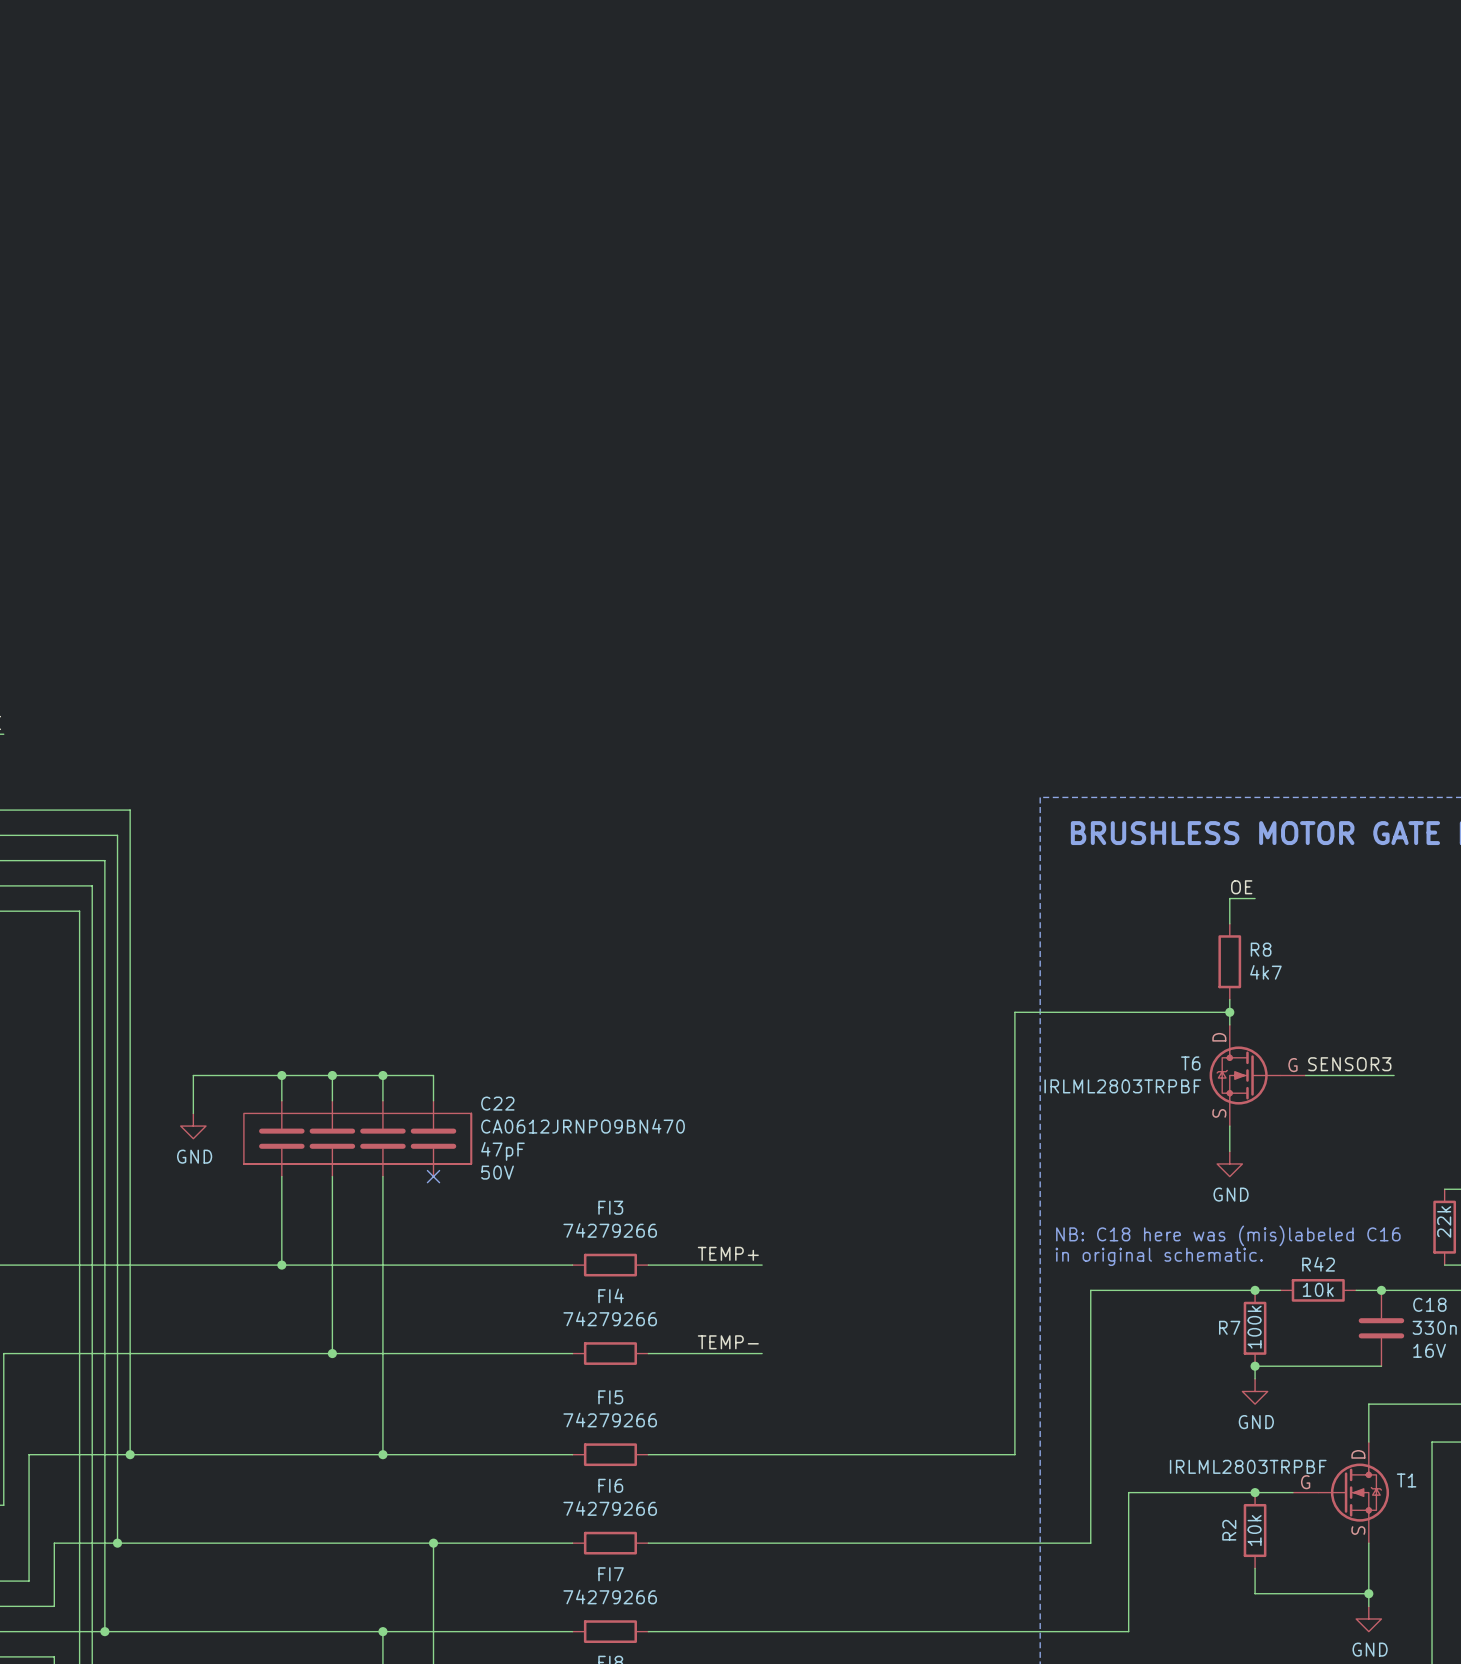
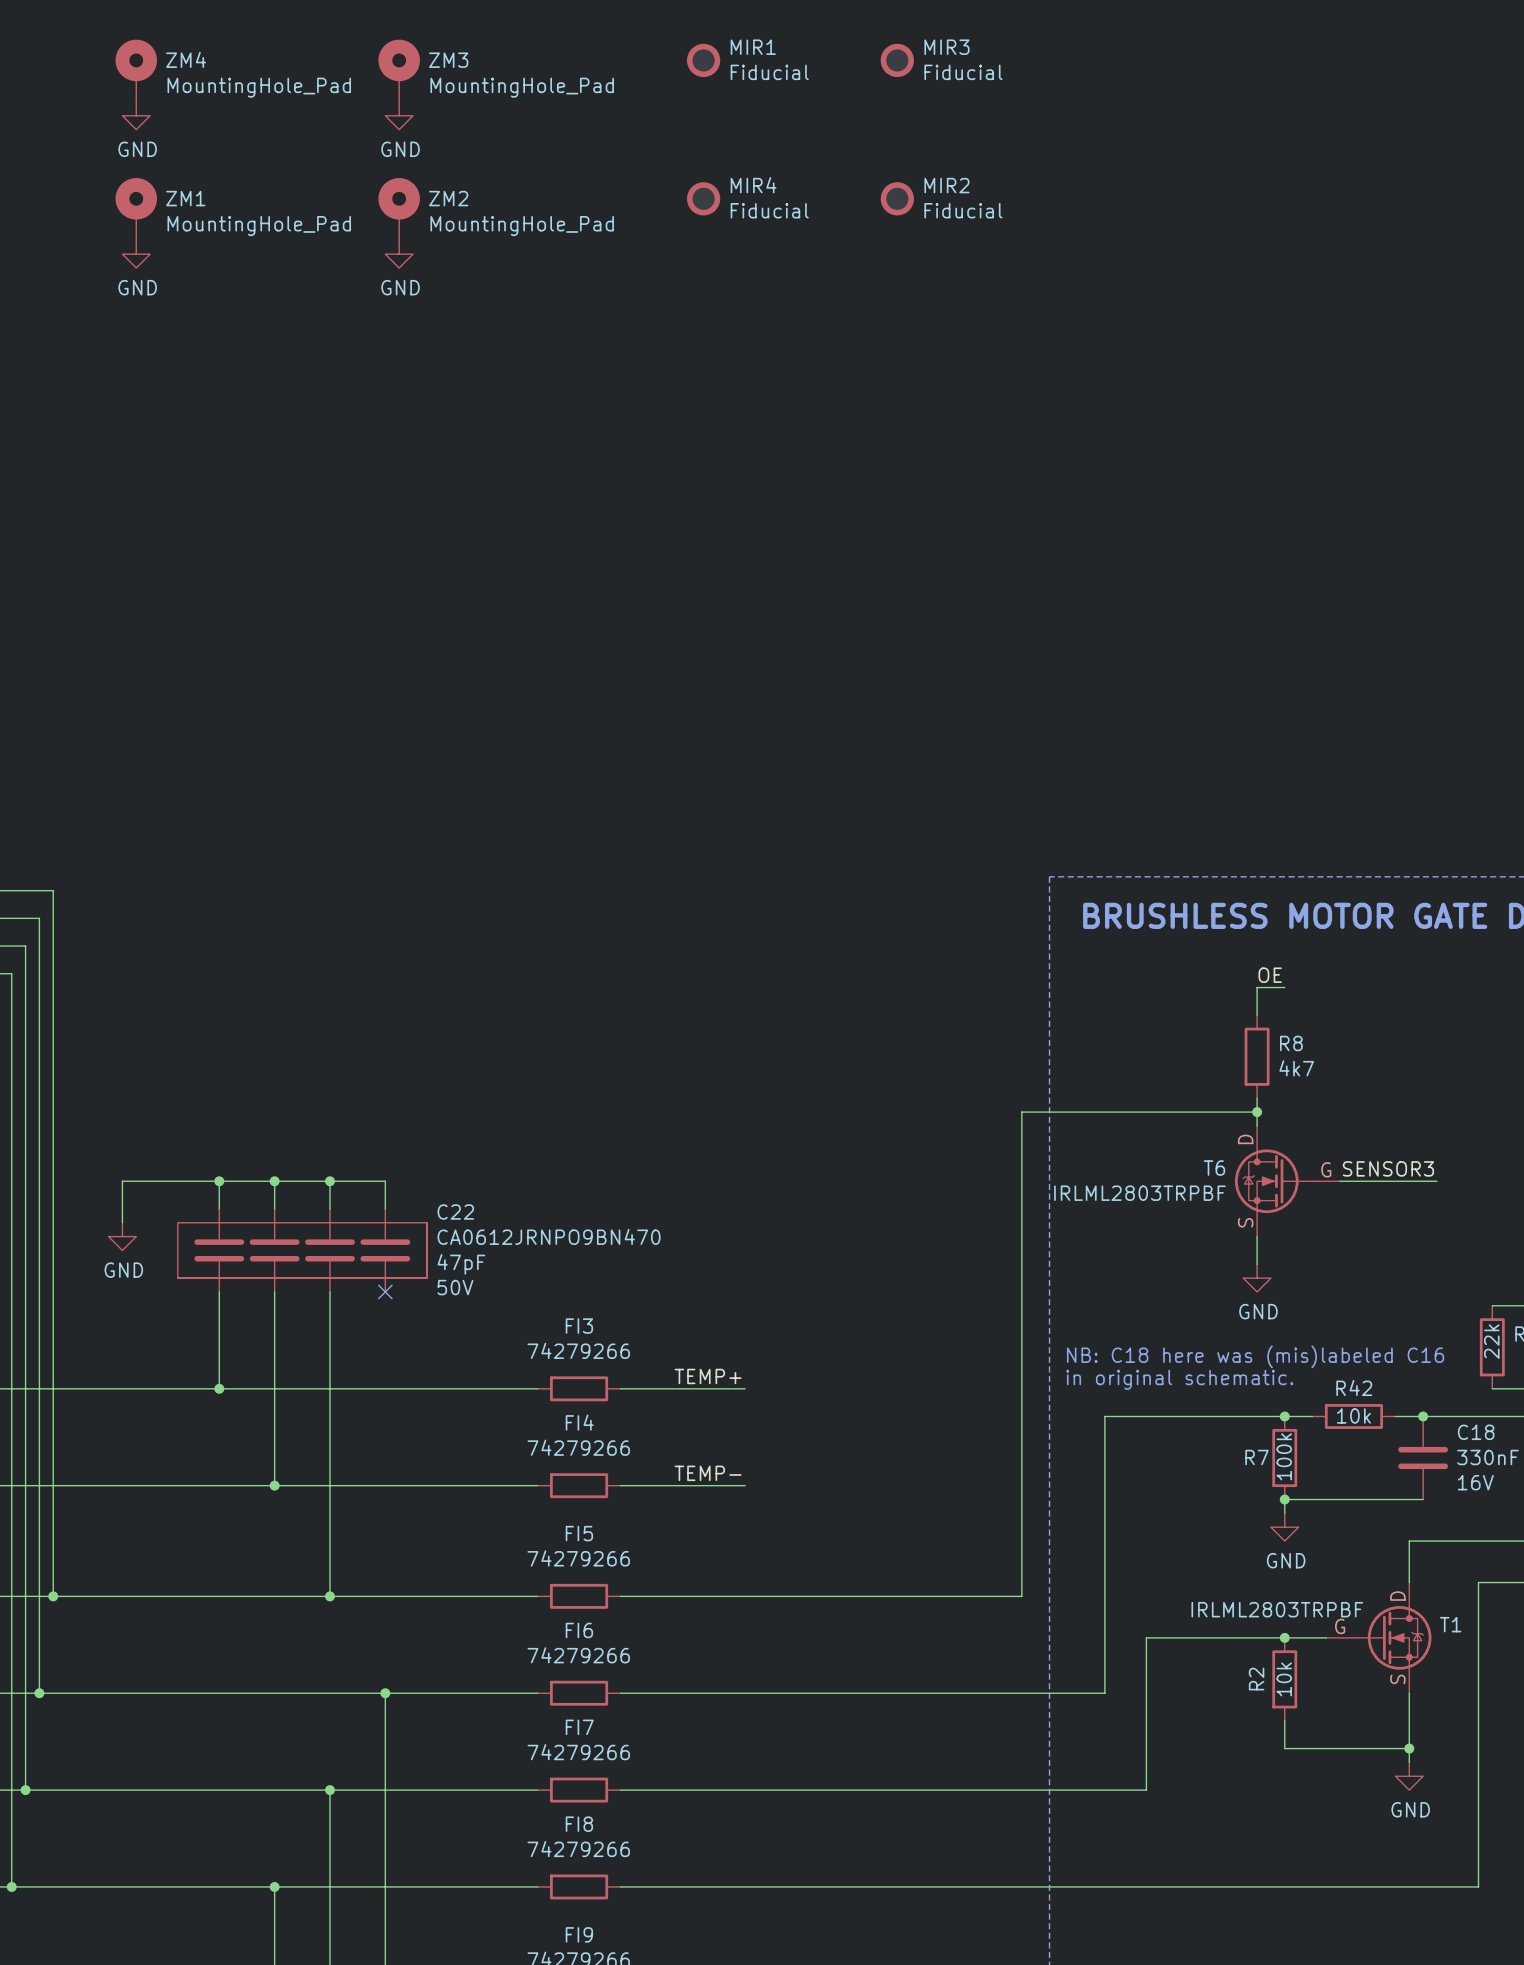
MIR1: none -> Fiducial (703, 60)
MIR3: none -> Fiducial (897, 60)
ZM4: none -> MountingHole_Pad (136, 70)
ZM3: none -> MountingHole_Pad (399, 70)
power symbol: none -> GND (136, 115)
power symbol: none -> GND (399, 115)
MIR4: none -> Fiducial (703, 198)
MIR2: none -> Fiducial (897, 198)
ZM1: none -> MountingHole_Pad (136, 209)
ZM2: none -> MountingHole_Pad (399, 209)
power symbol: none -> GND (136, 254)
power symbol: none -> GND (399, 254)

